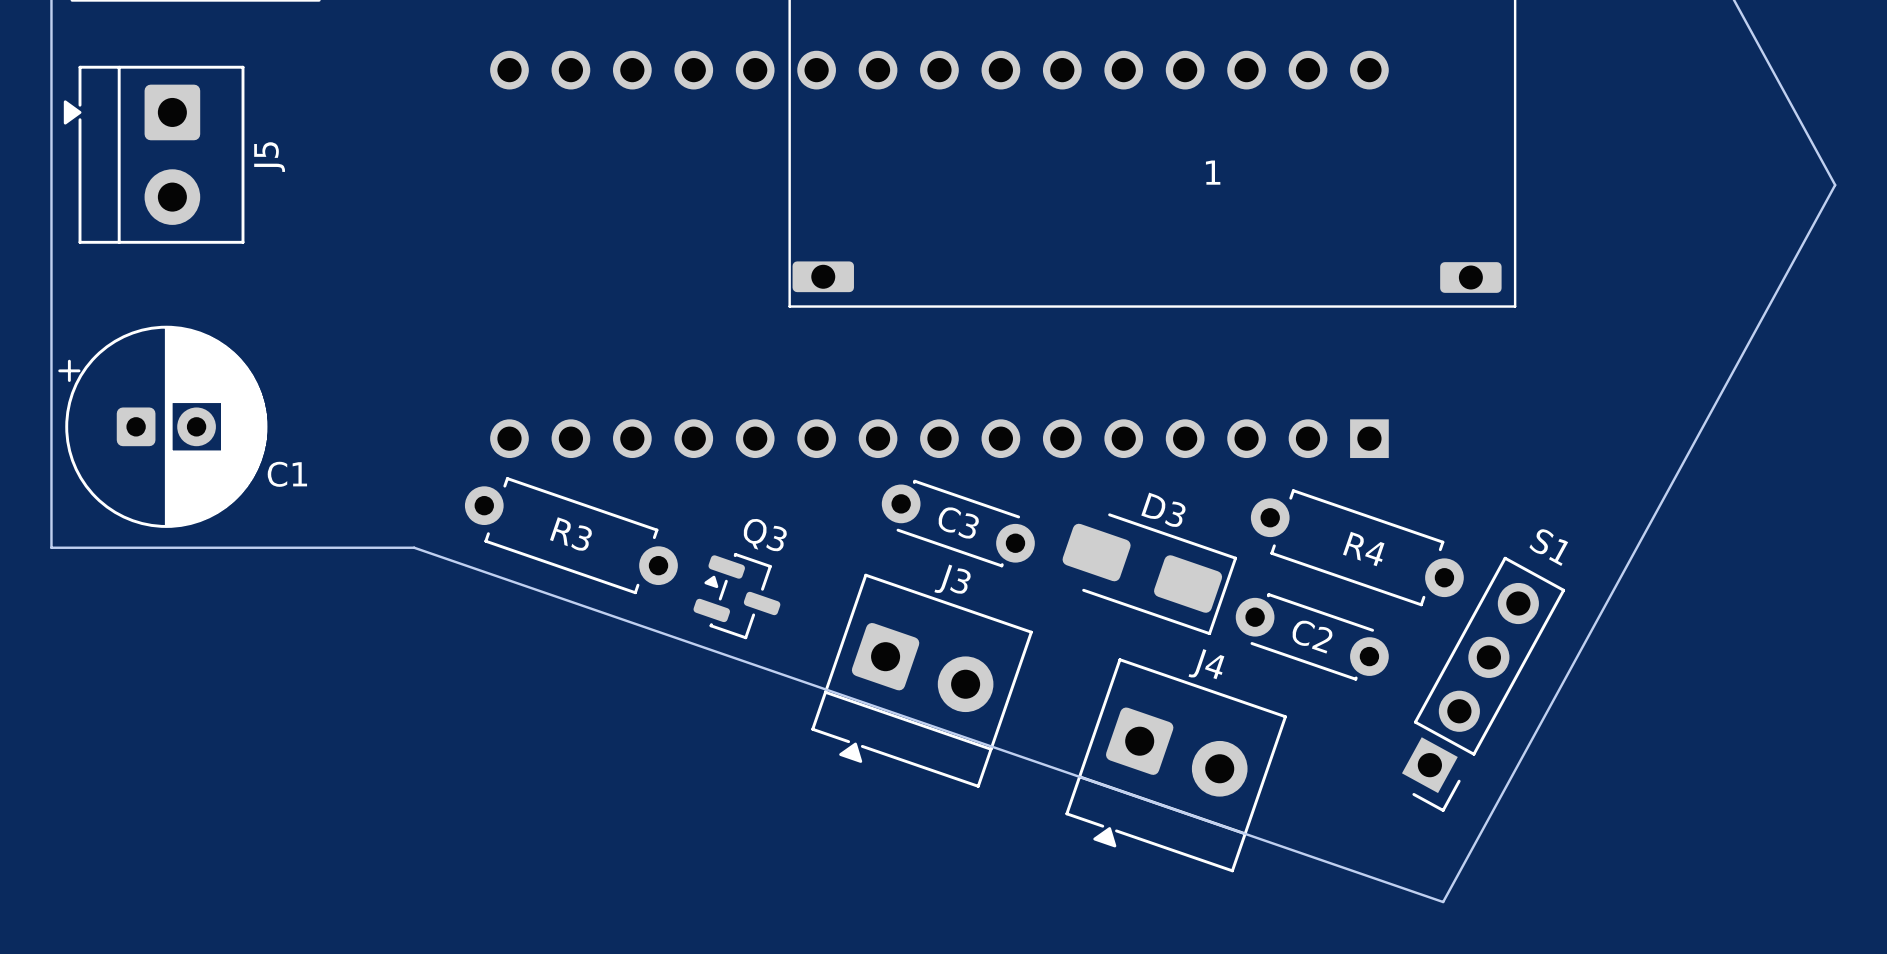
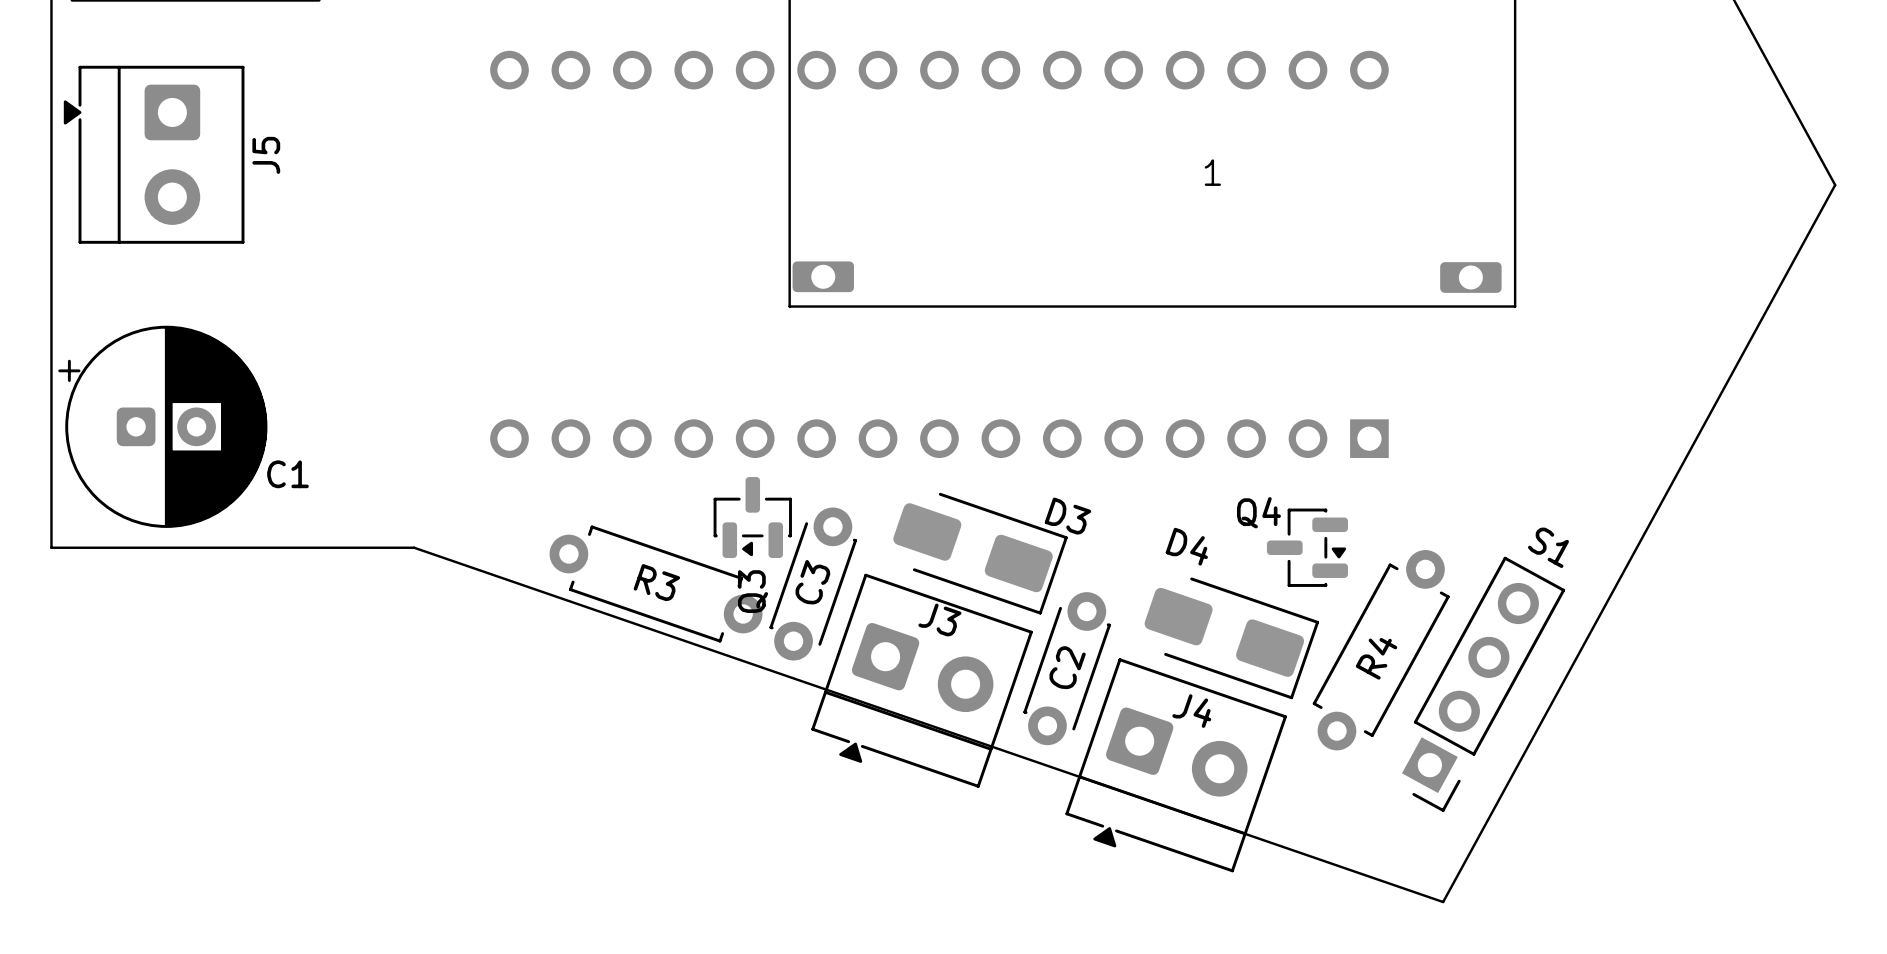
D3 name position: D3 (1163, 510) -> D3 (1067, 516)
C3 rotation: 0° (958, 523) -> 90° clockwise (813, 584)
C3 position: (958, 523) -> (813, 584)
Q3 name position: Q3 (765, 534) -> Q3 (753, 591)
R3 position: (571, 535) -> (656, 584)
Q4: none -> (1307, 547)
R4 rotation: 0° (1357, 547) -> 80.3° counterclockwise (1381, 650)
D3 position: (1149, 574) -> (980, 553)
J3 name position: J3 (952, 579) -> J3 (939, 620)
Q3 rotation: 0° (736, 596) -> 109° counterclockwise (752, 517)
Q3 position: (736, 596) -> (752, 517)
C2 rotation: 0° (1312, 636) -> 90° clockwise (1067, 668)
C2 position: (1312, 636) -> (1067, 668)
D4: none -> (1231, 638)
J4 name position: J4 (1206, 664) -> J4 (1191, 711)

